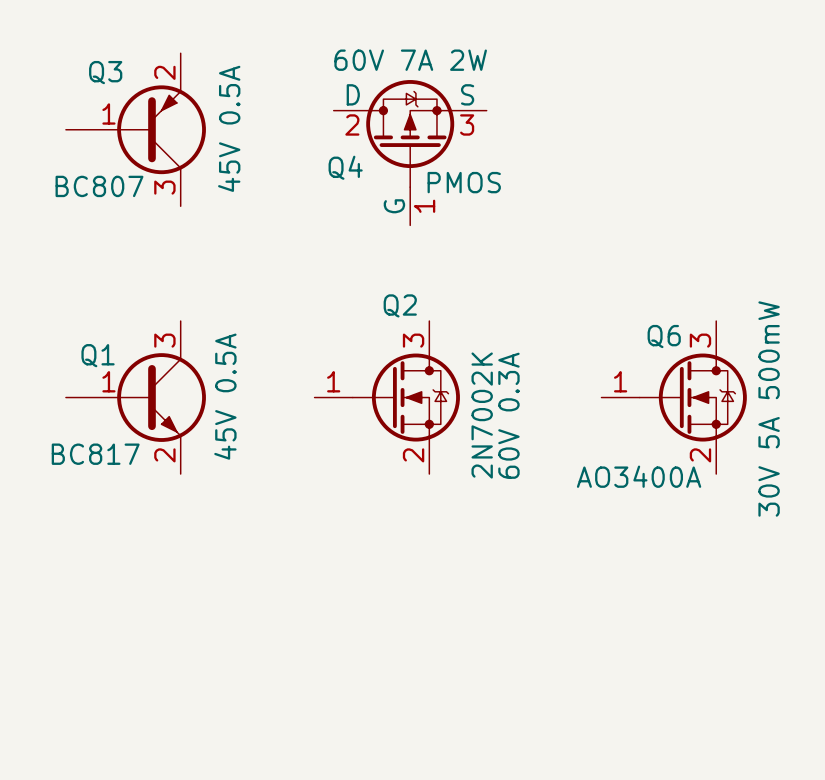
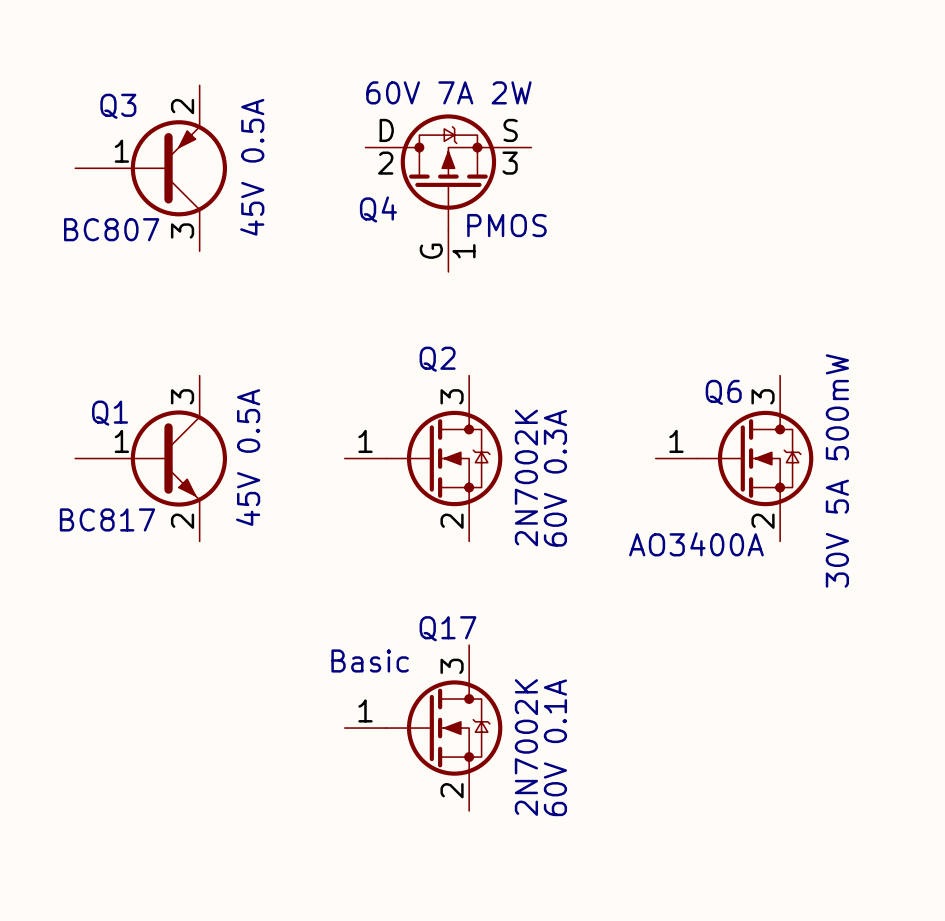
text: none -> Basic (370, 660)
Q17: none -> 2N7002K (423, 728)

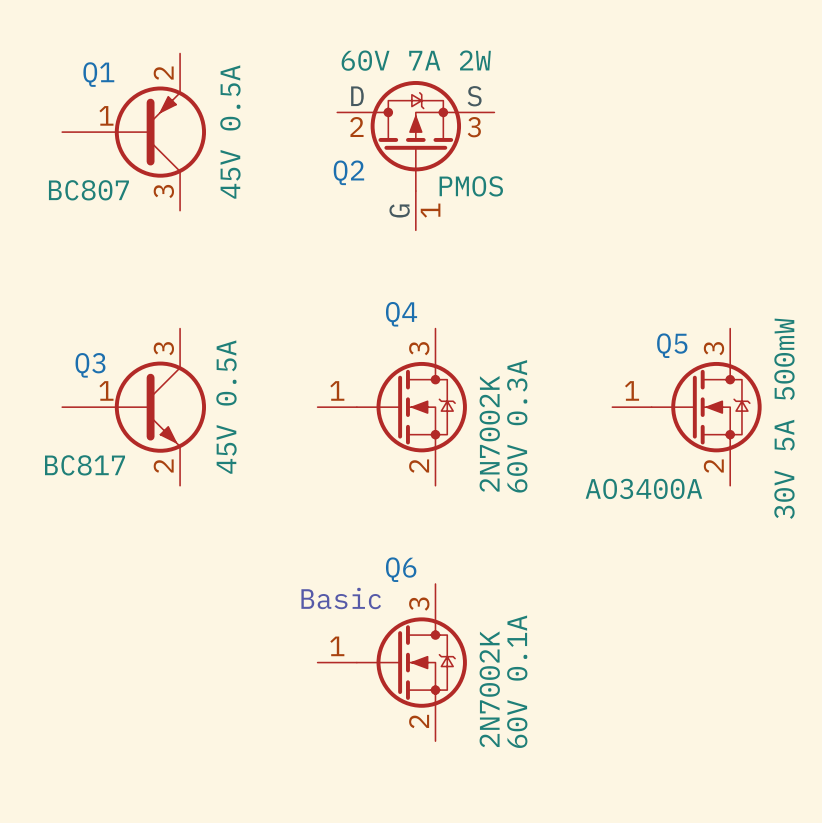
Q3 name: Q3 (118, 106) -> Q1 (98, 74)
Q4 name: Q4 (378, 209) -> Q2 (348, 172)
Q2 name: Q2 (437, 359) -> Q4 (401, 314)
Q6 name: Q6 (723, 392) -> Q5 (672, 345)
Q1 name: Q1 (110, 413) -> Q3 (90, 365)
Q17 name: Q17 (447, 628) -> Q6 (401, 569)

